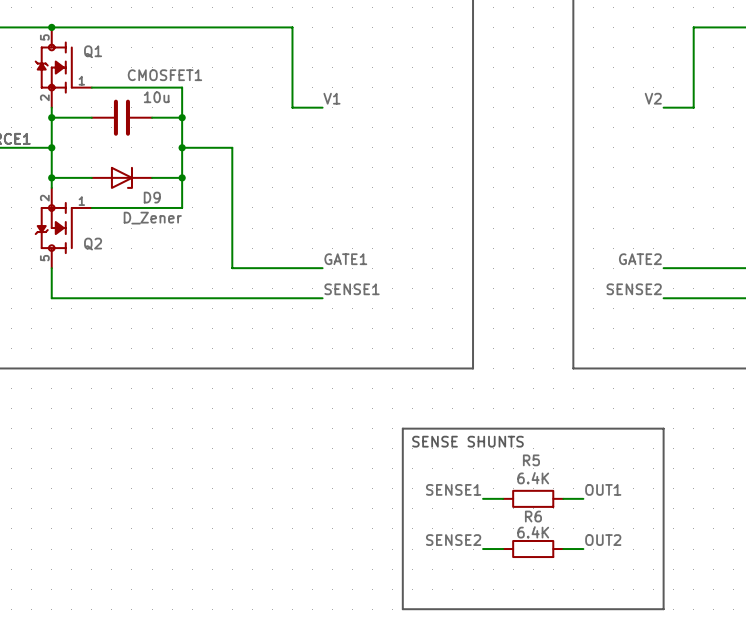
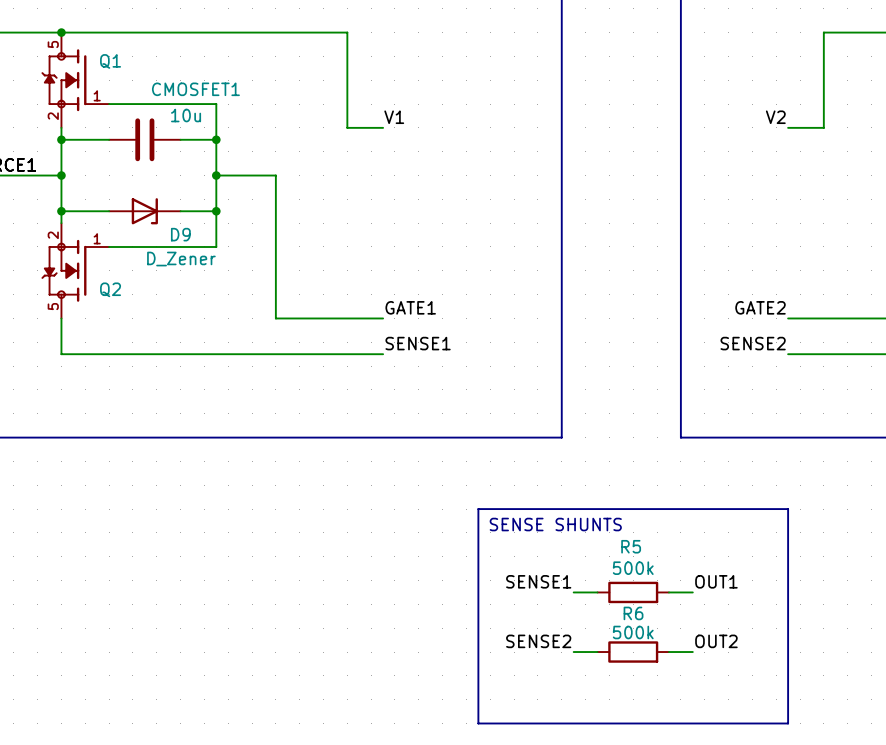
R5 value: 6.4K (533, 478) -> 500k (633, 568)
R6 value: 6.4K (533, 532) -> 500k (633, 632)

